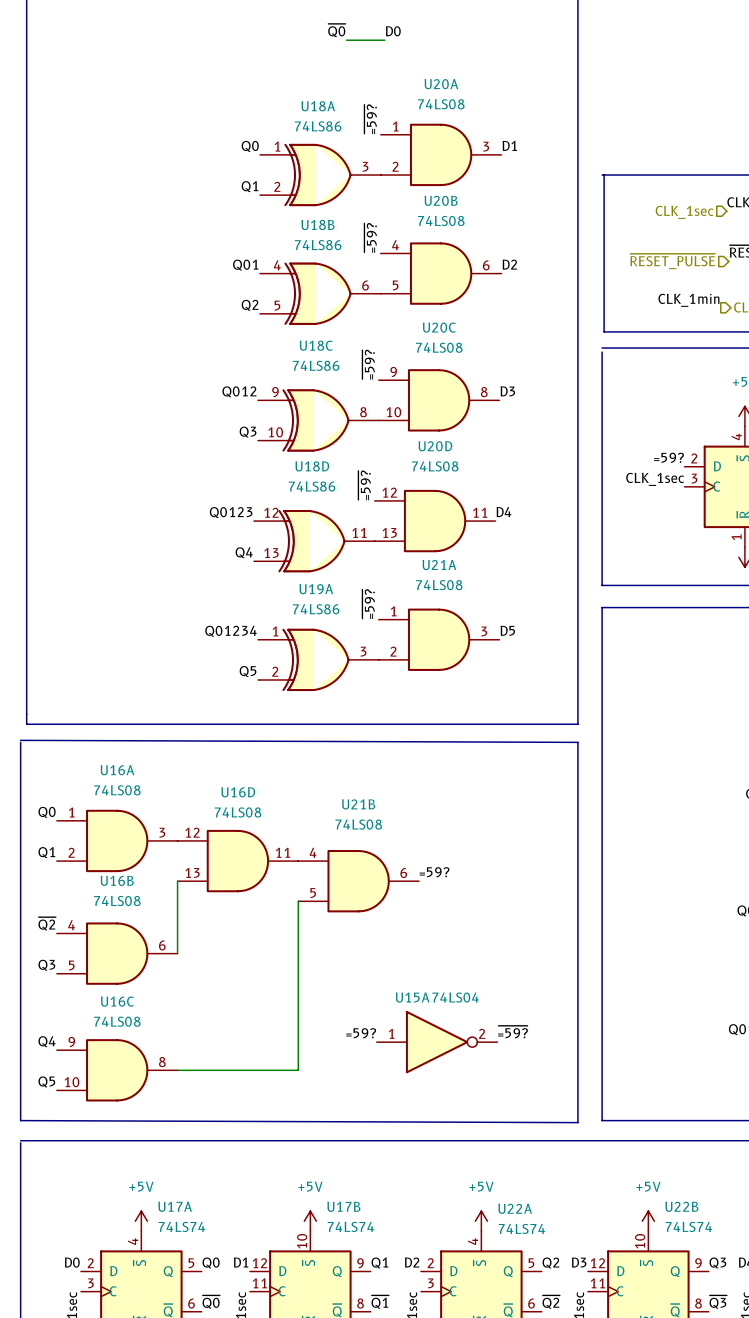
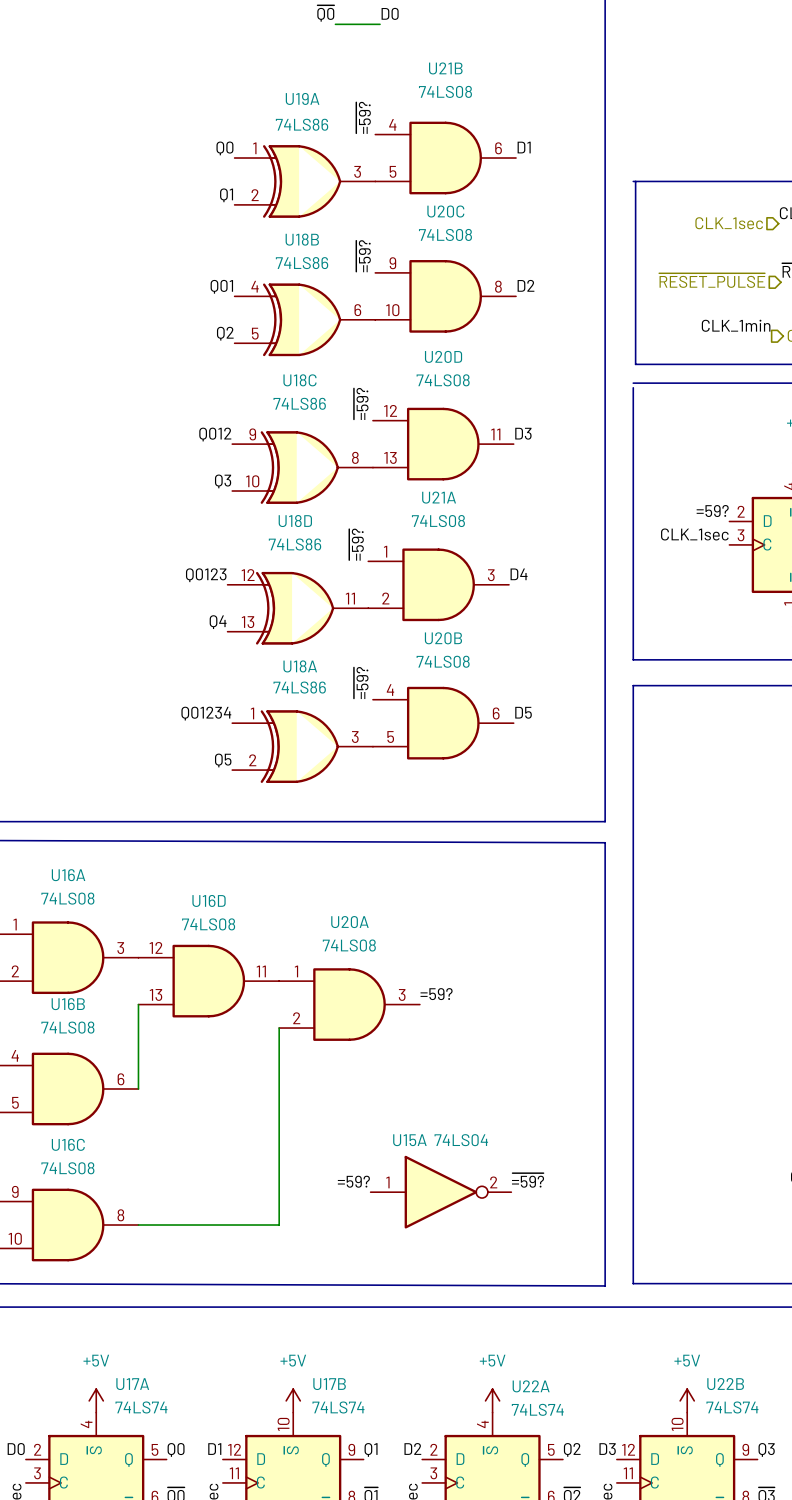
U18A name: U18A (318, 106) -> U19A (302, 98)
U20A position: (441, 154) -> (349, 1004)
U20B position: (441, 273) -> (443, 723)
U20C position: (439, 400) -> (445, 296)
U20D position: (435, 521) -> (443, 444)
U19A name: U19A (316, 589) -> U18A (300, 666)
U21A position: (439, 639) -> (438, 584)
U21B position: (358, 881) -> (445, 158)

